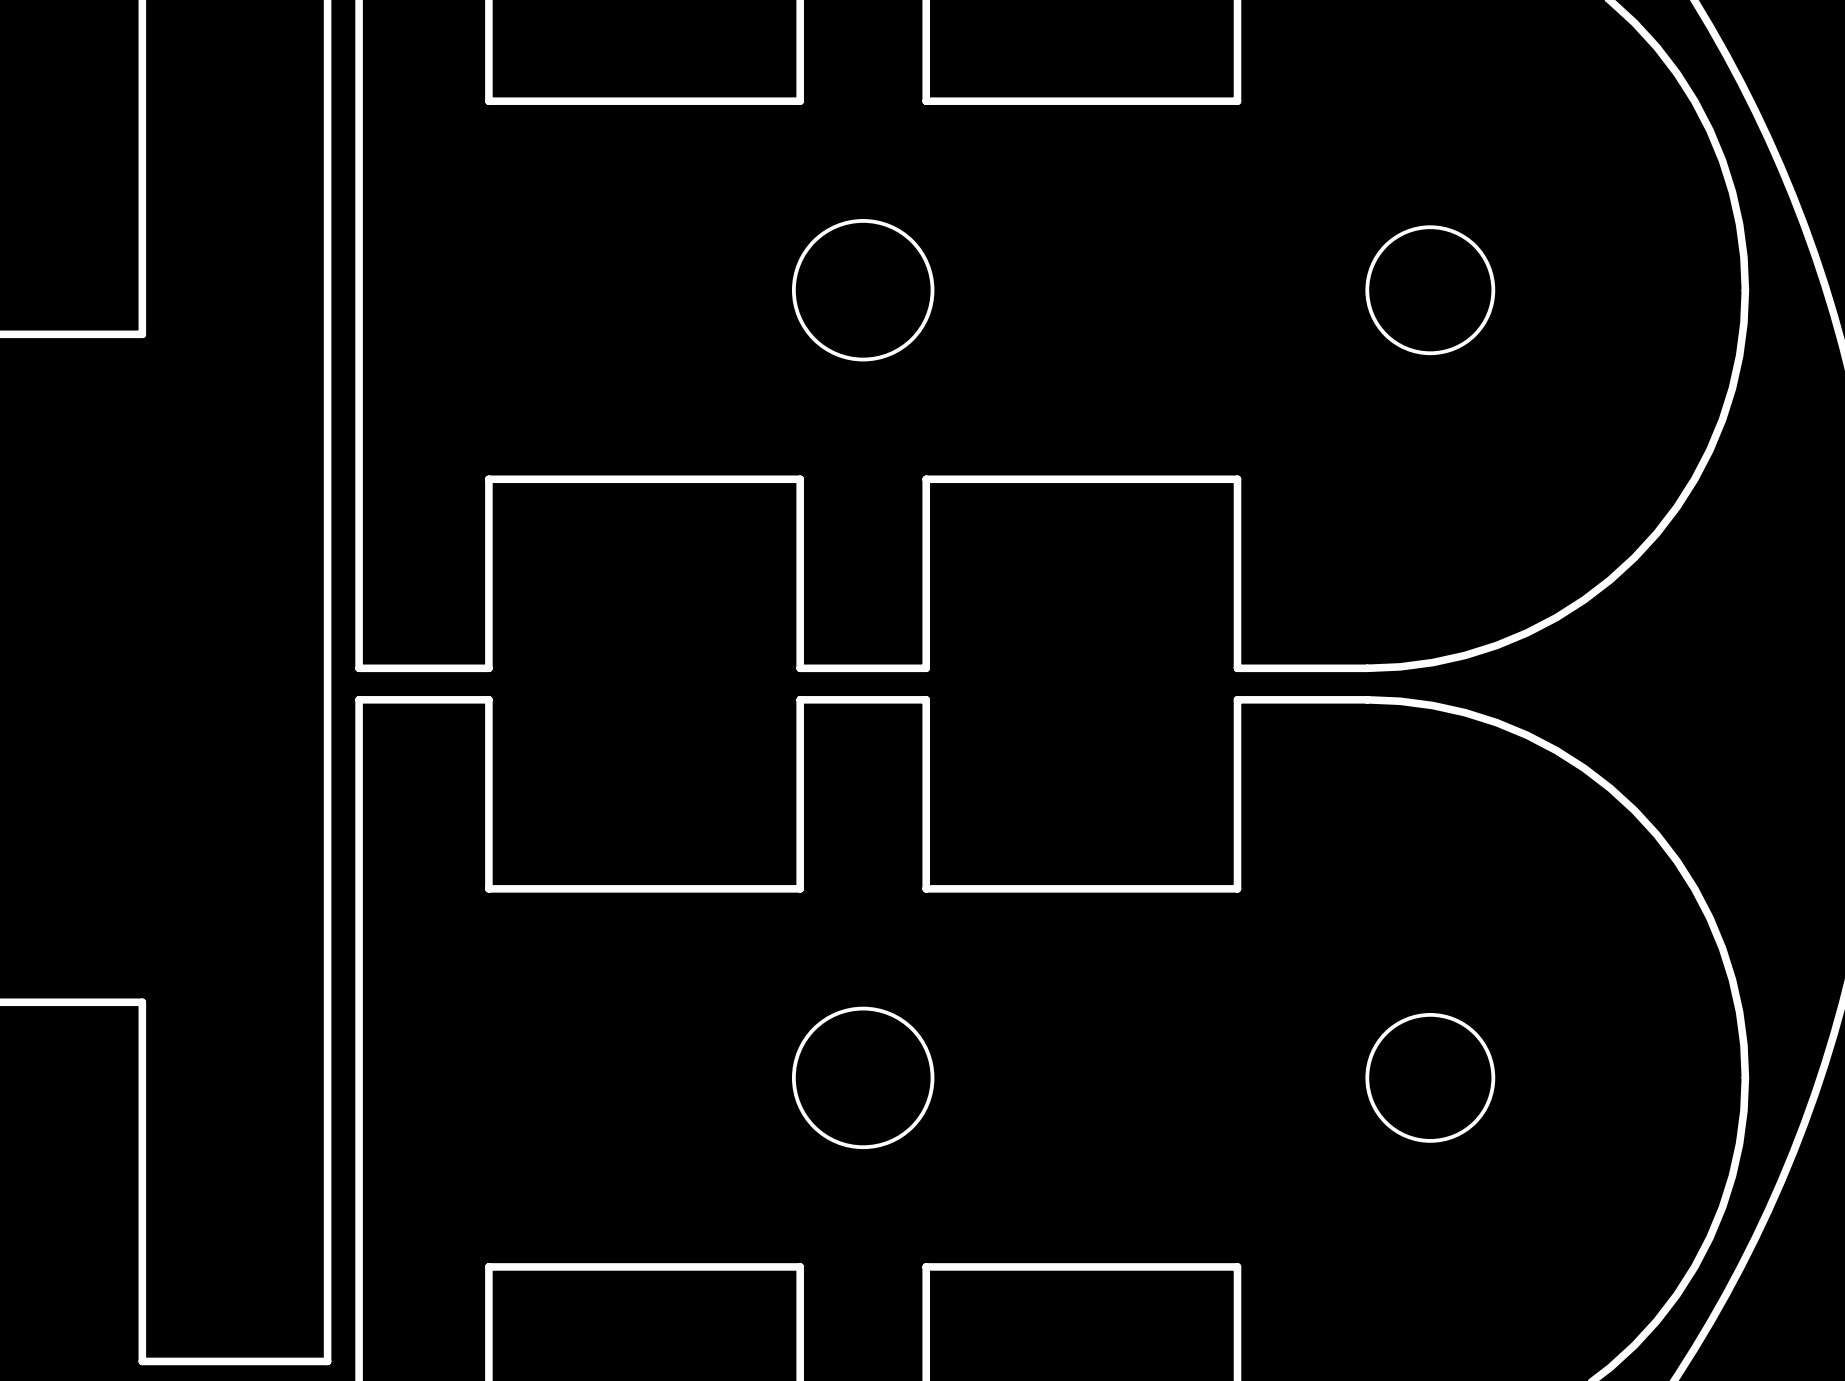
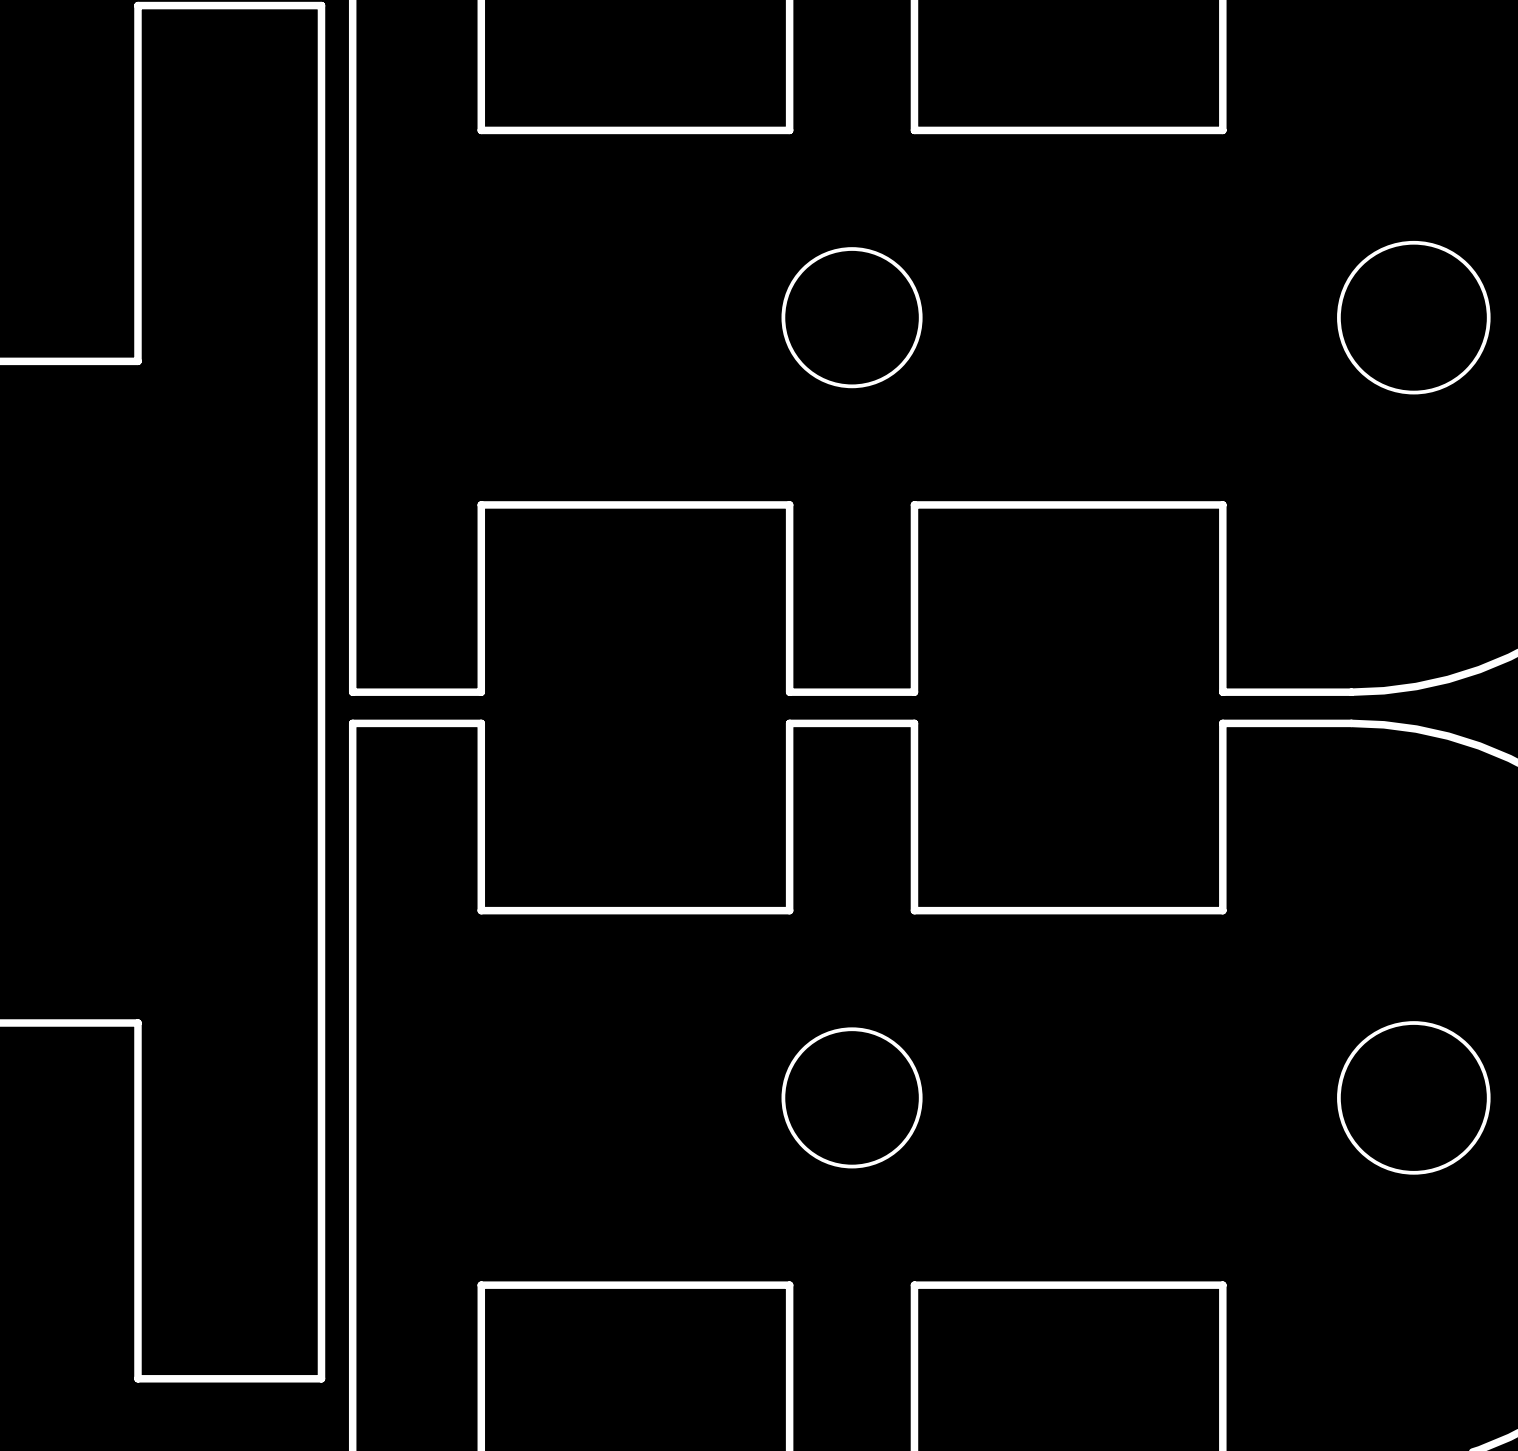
round board edge size: [1365, 225, 1496, 356] -> [1337, 240, 1491, 395]
round board edge size: [1365, 1012, 1496, 1143] -> [1337, 1021, 1491, 1175]

